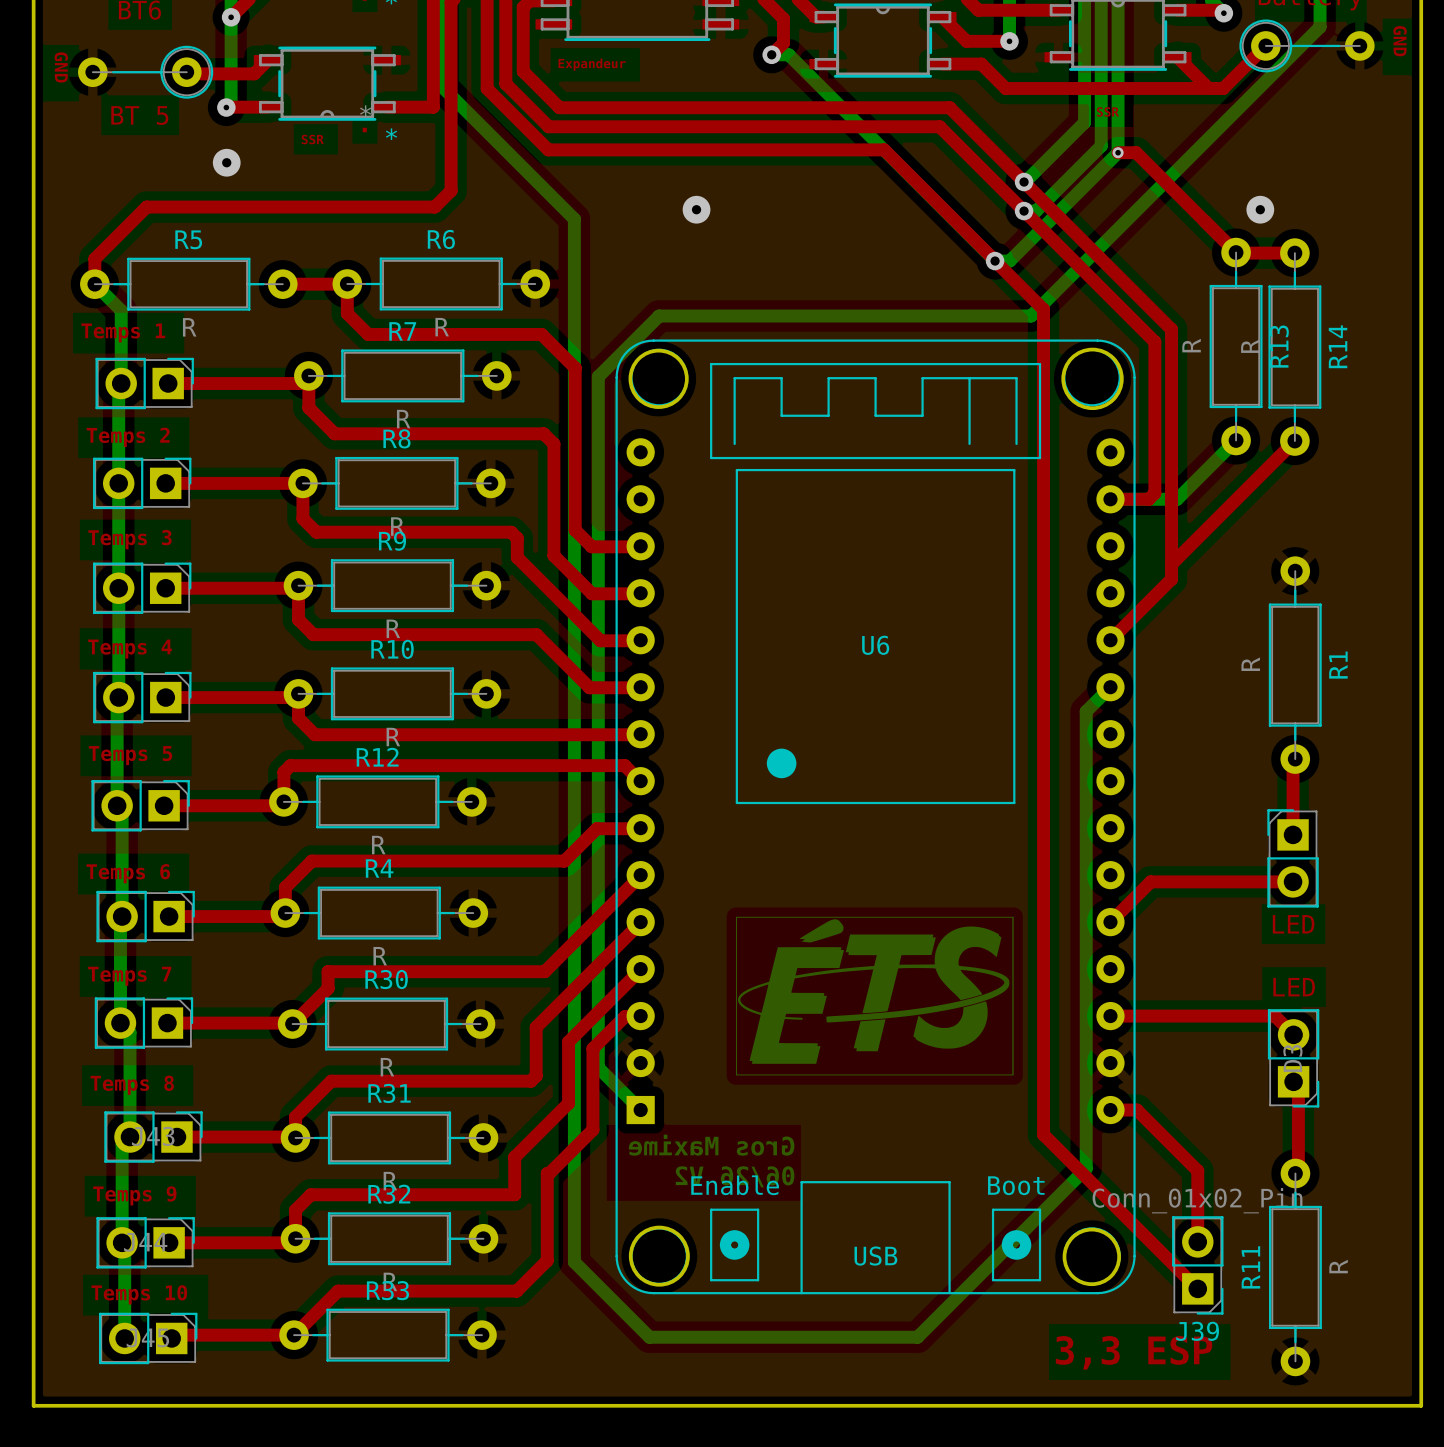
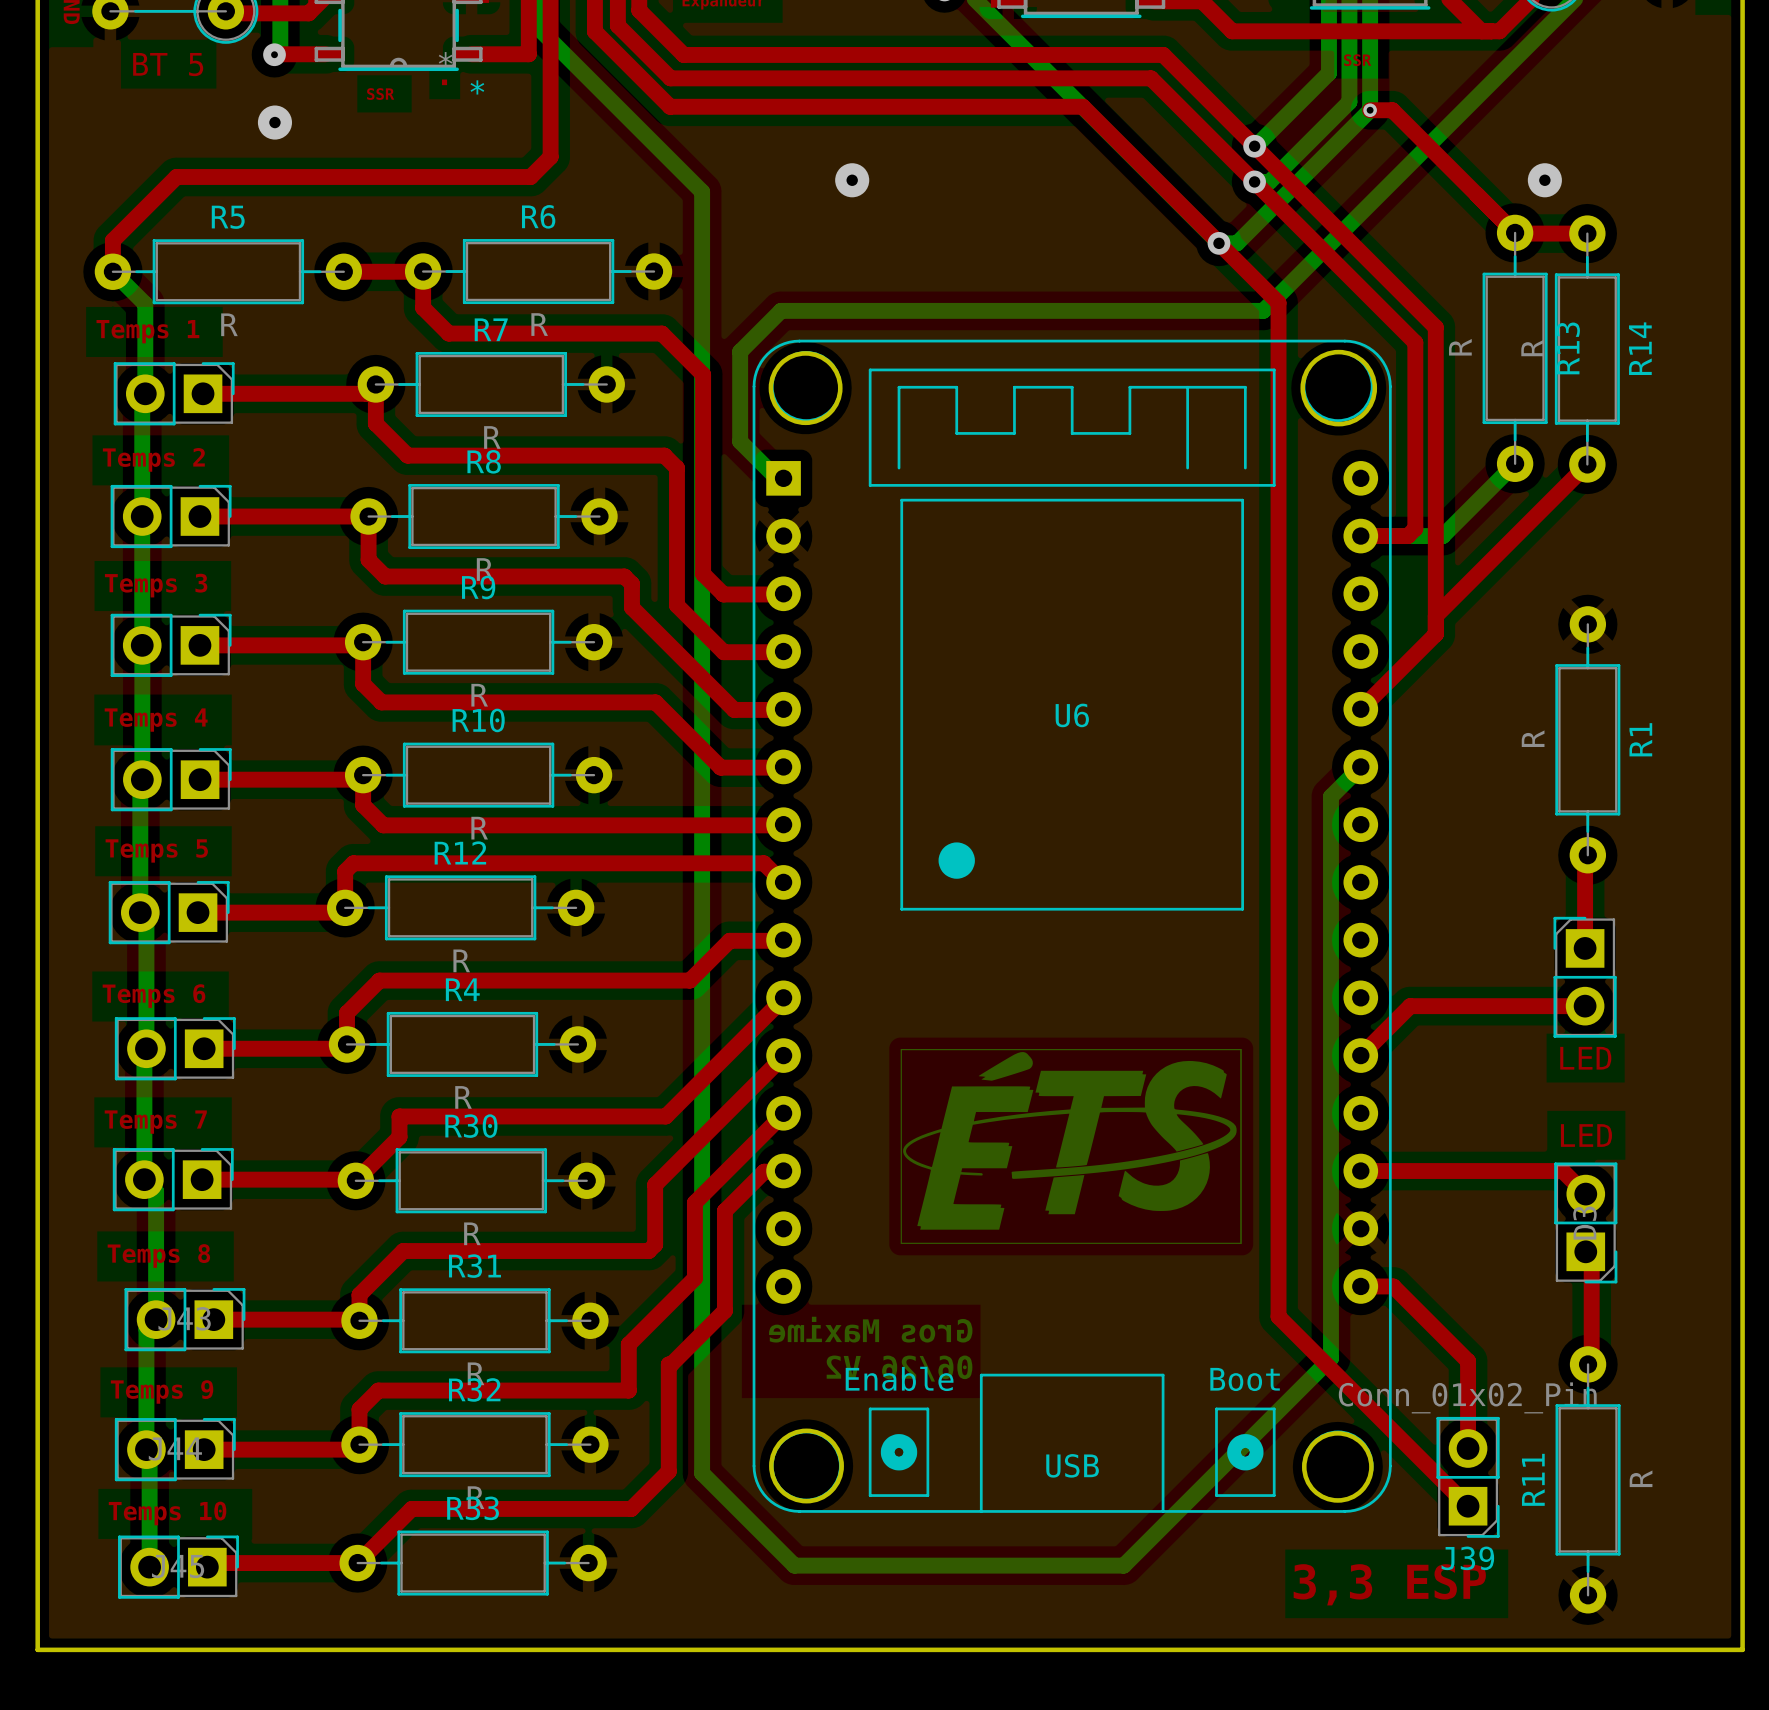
bottom track: (659, 316) (598, 376) (598, 1067) (640, 1110) -> (806, 310) (781, 310) (740, 351) (740, 441) (776, 478)
U6 footprint: [615, 339, 1136, 1295] -> [752, 339, 1392, 1513]

